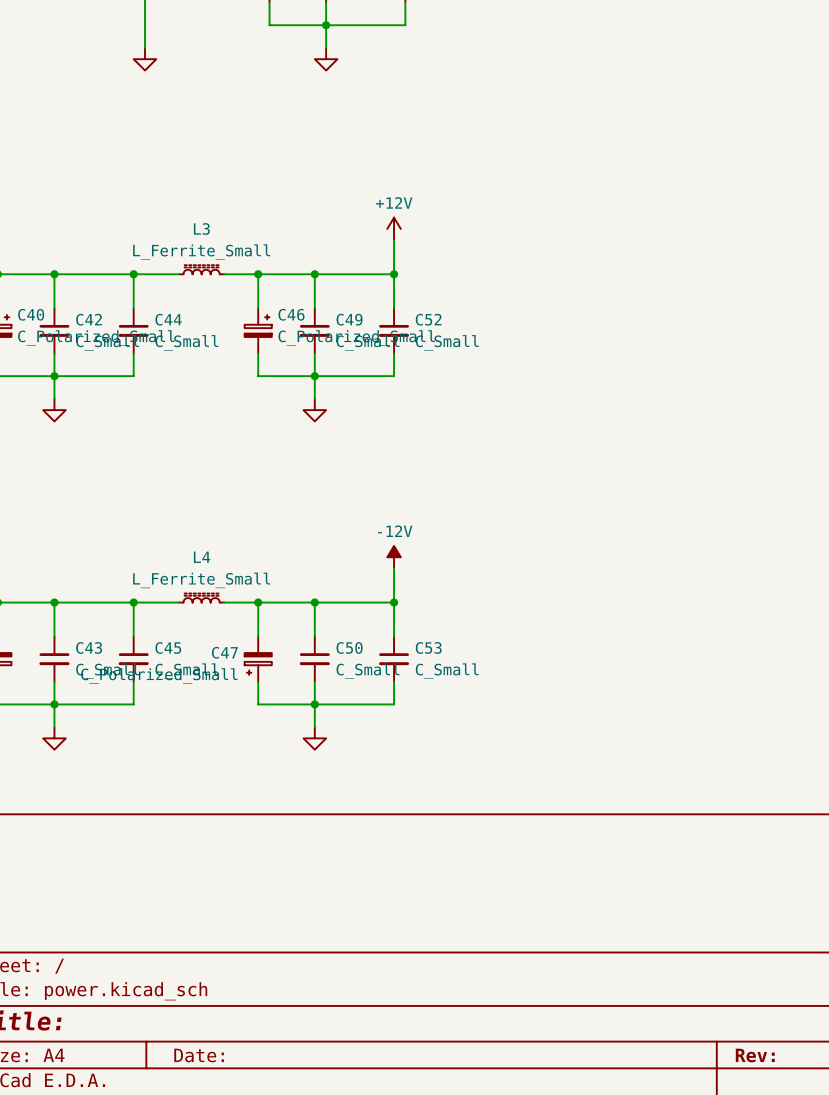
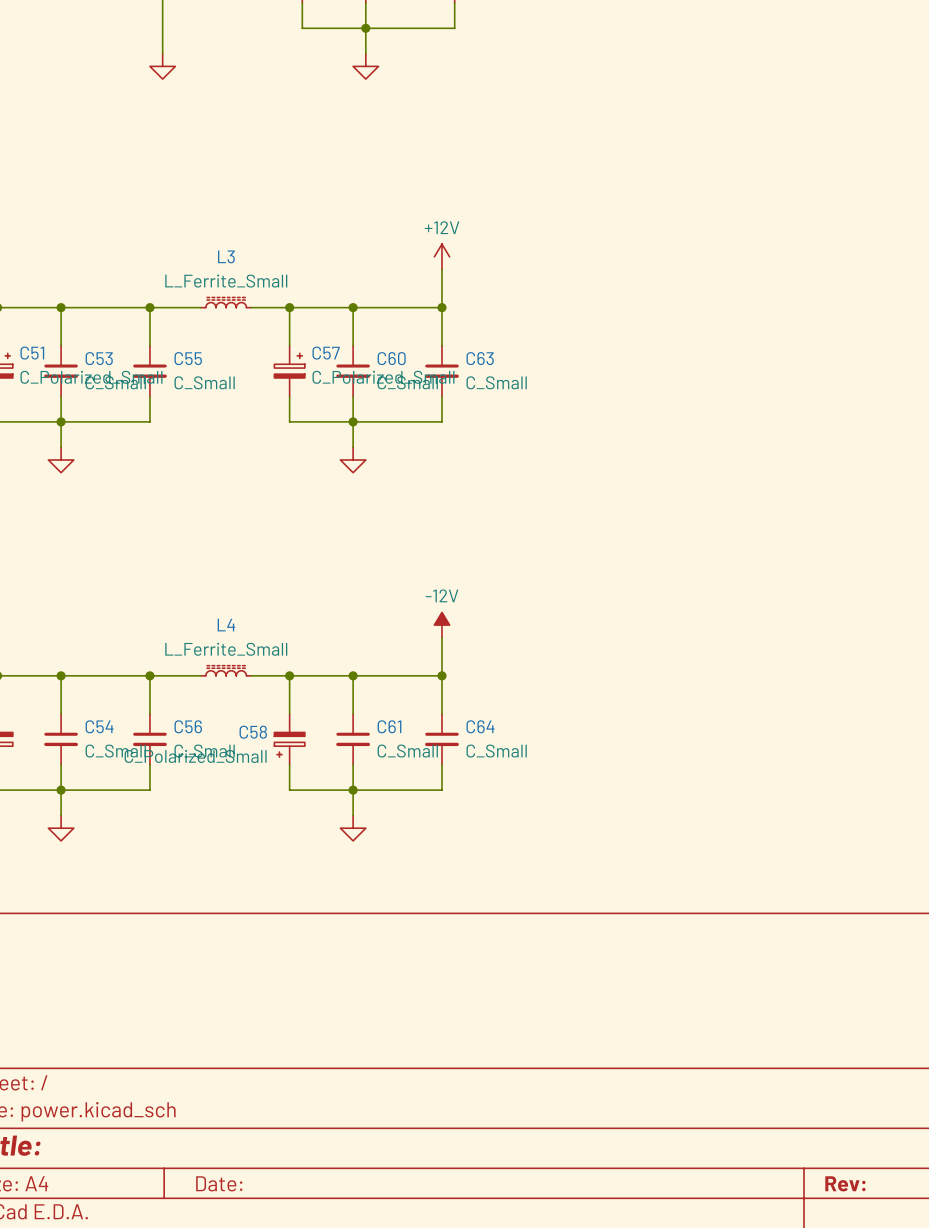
C40 name: C40 (31, 314) -> C51 (32, 353)
C46 name: C46 (291, 314) -> C57 (326, 353)
C42 name: C42 (89, 319) -> C53 (99, 358)
C44 name: C44 (168, 319) -> C55 (188, 358)
C49 name: C49 (349, 319) -> C60 (391, 358)
C52 name: C52 (428, 319) -> C63 (480, 358)
C43 name: C43 (89, 647) -> C54 (99, 726)
C45 name: C45 (168, 647) -> C56 (188, 726)
C50 name: C50 (349, 647) -> C61 (389, 726)
C53 name: C53 (428, 647) -> C64 (480, 726)
C47 name: C47 (224, 652) -> C58 (253, 732)

